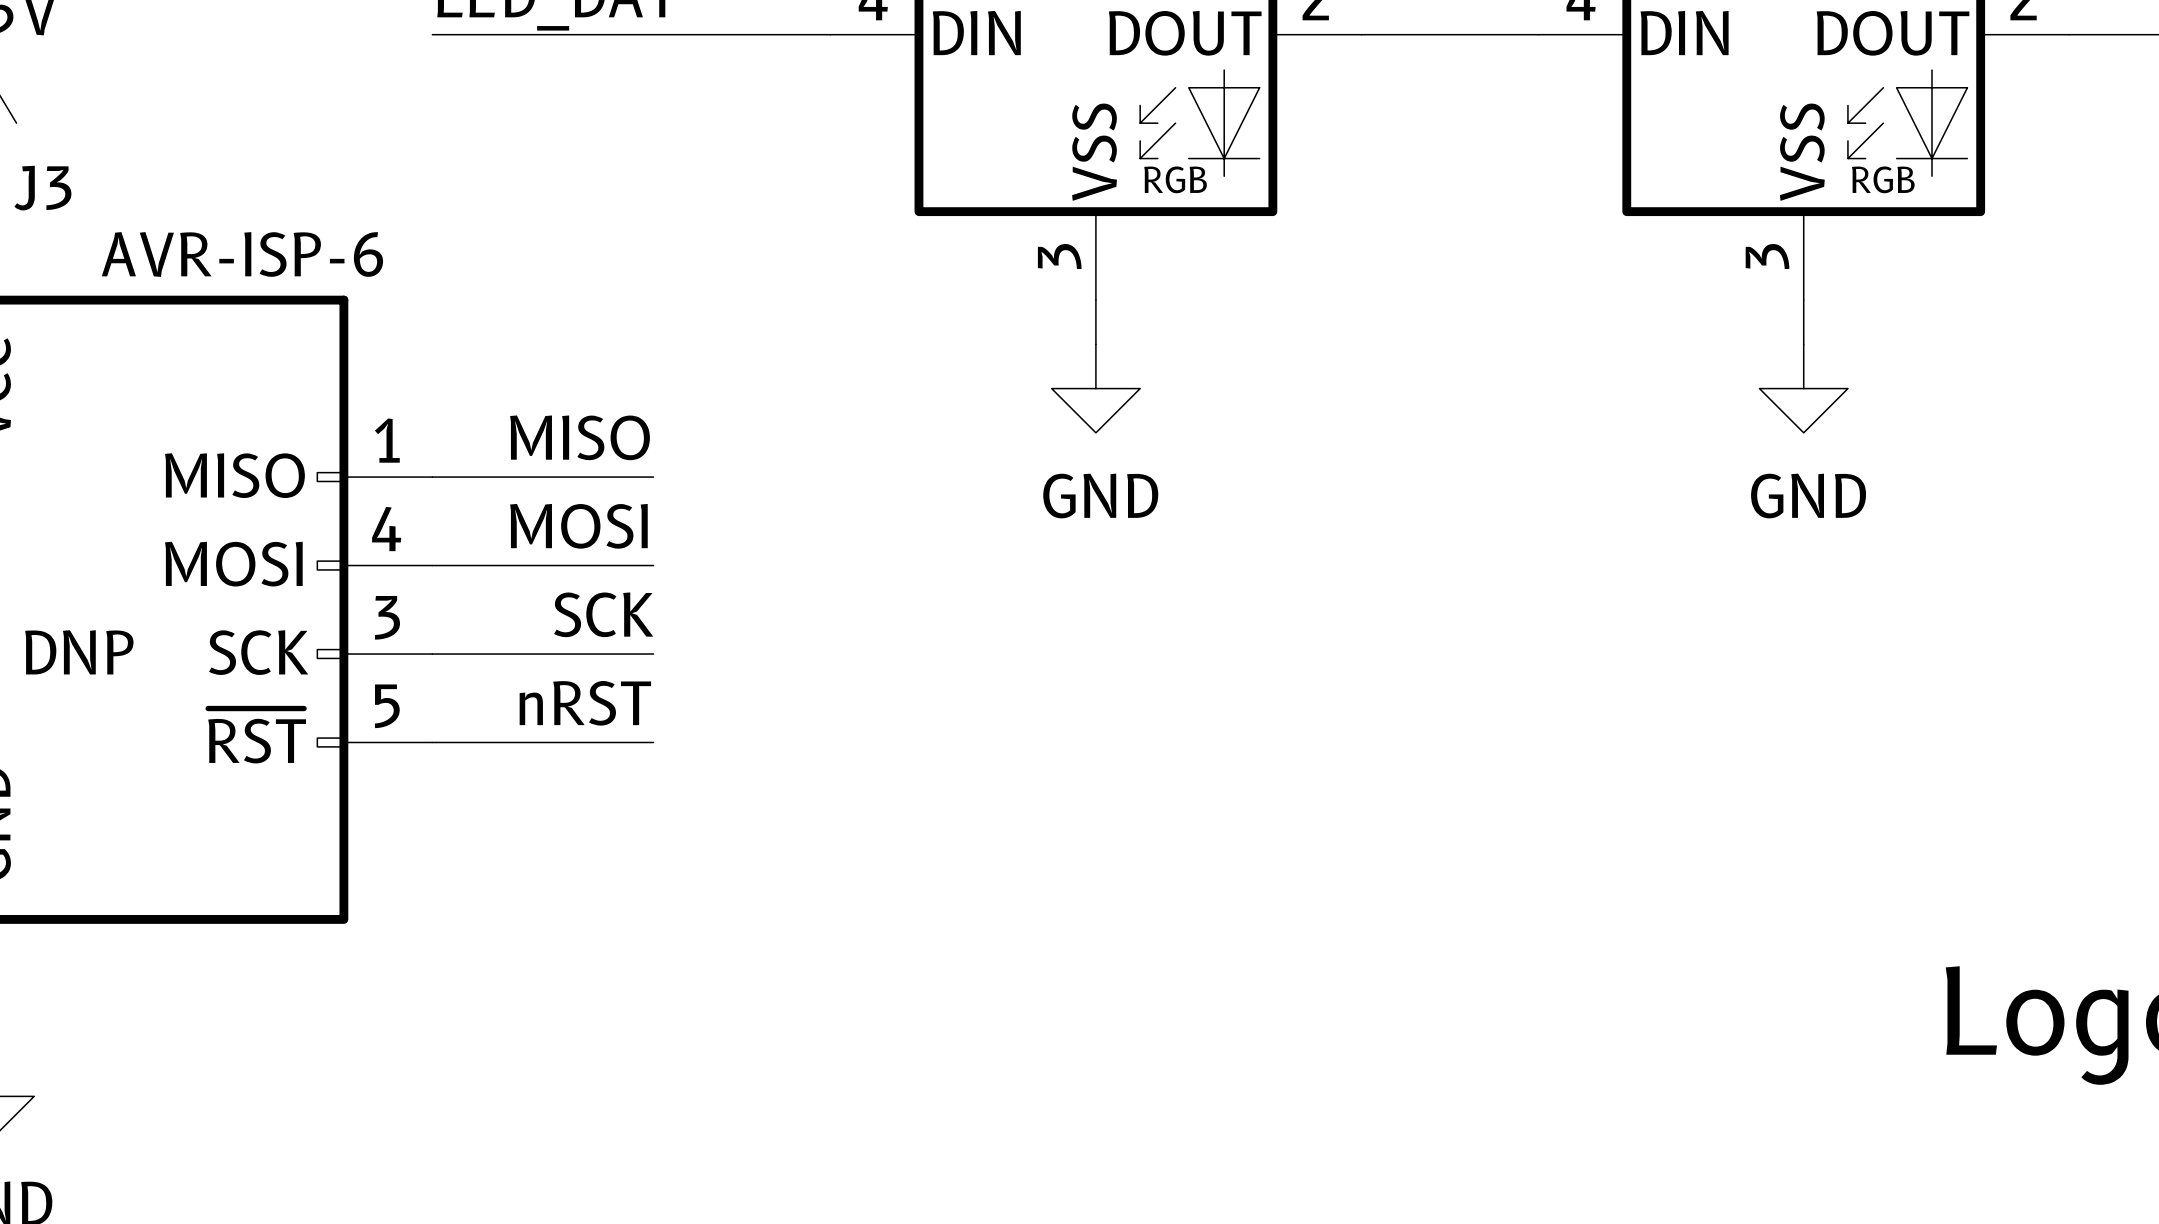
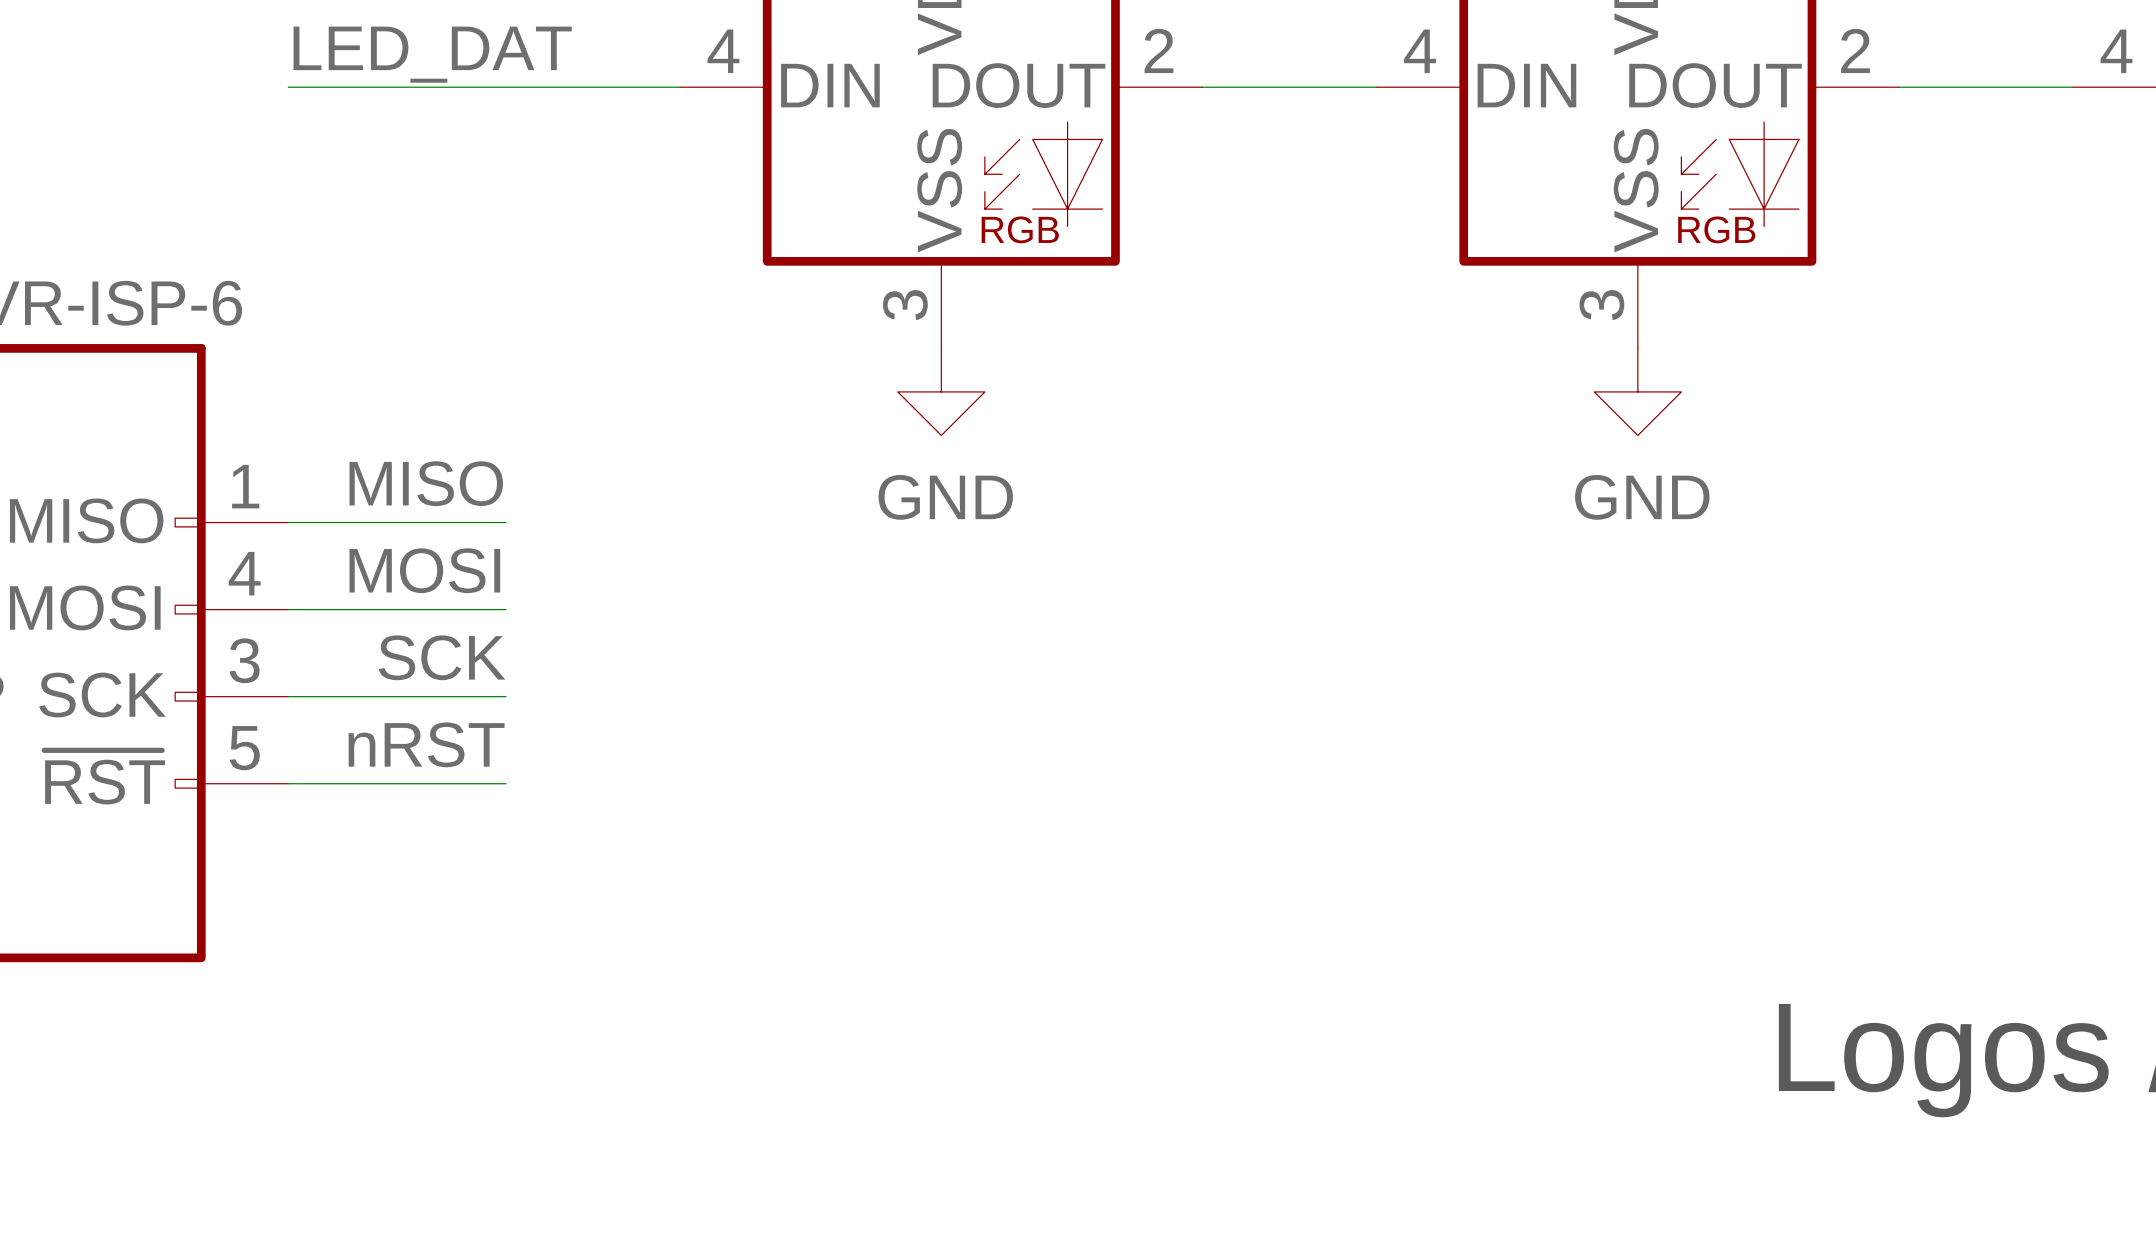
power symbol position: GND (1095, 388) -> GND (941, 391)
power symbol position: GND (1803, 388) -> GND (1637, 391)

